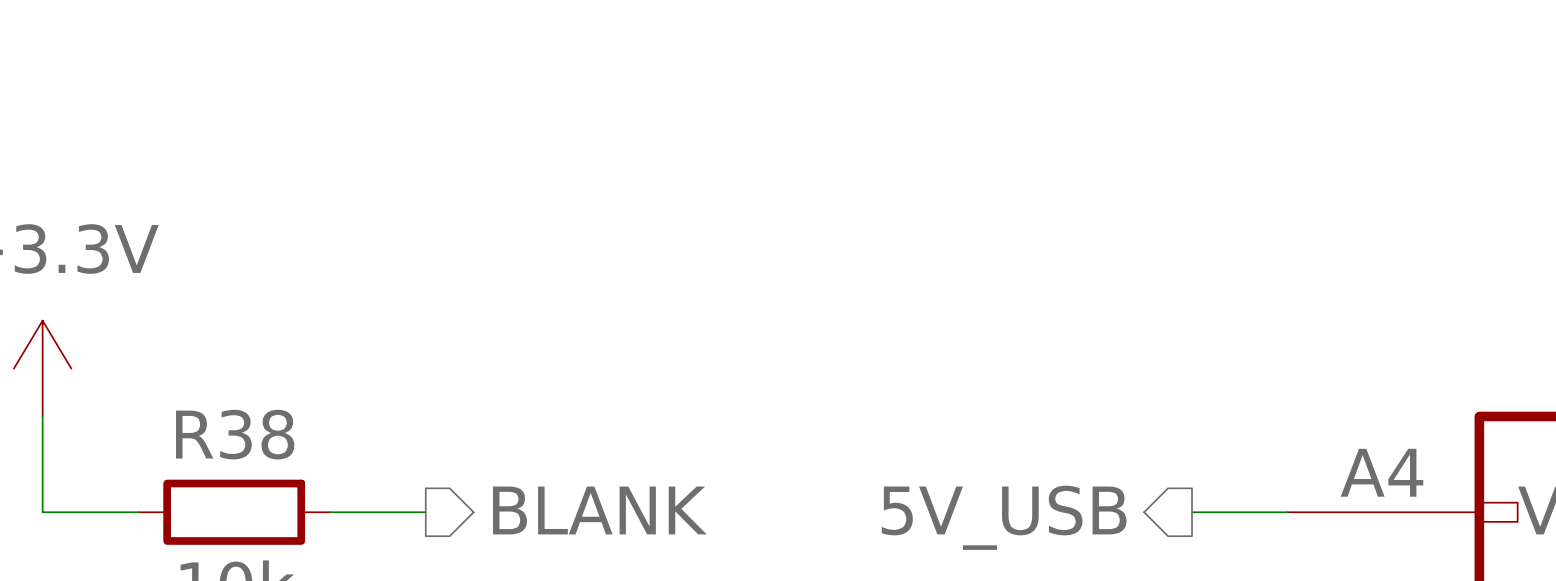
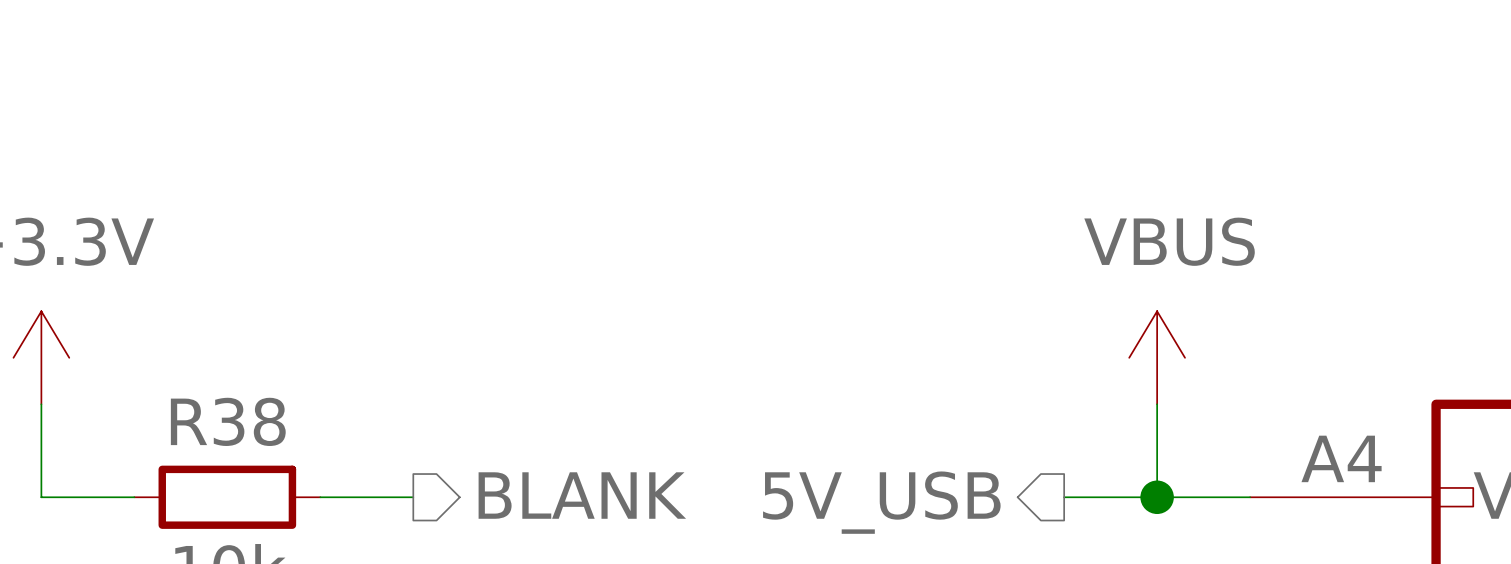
power symbol: none -> VBUS (1157, 357)
wire: none -> (1157, 404) (1157, 497) (1064, 497)
junction: none -> (1157, 497)
hierarchical label position: 5V_USB (1004, 517) -> 5V_USB (881, 502)

